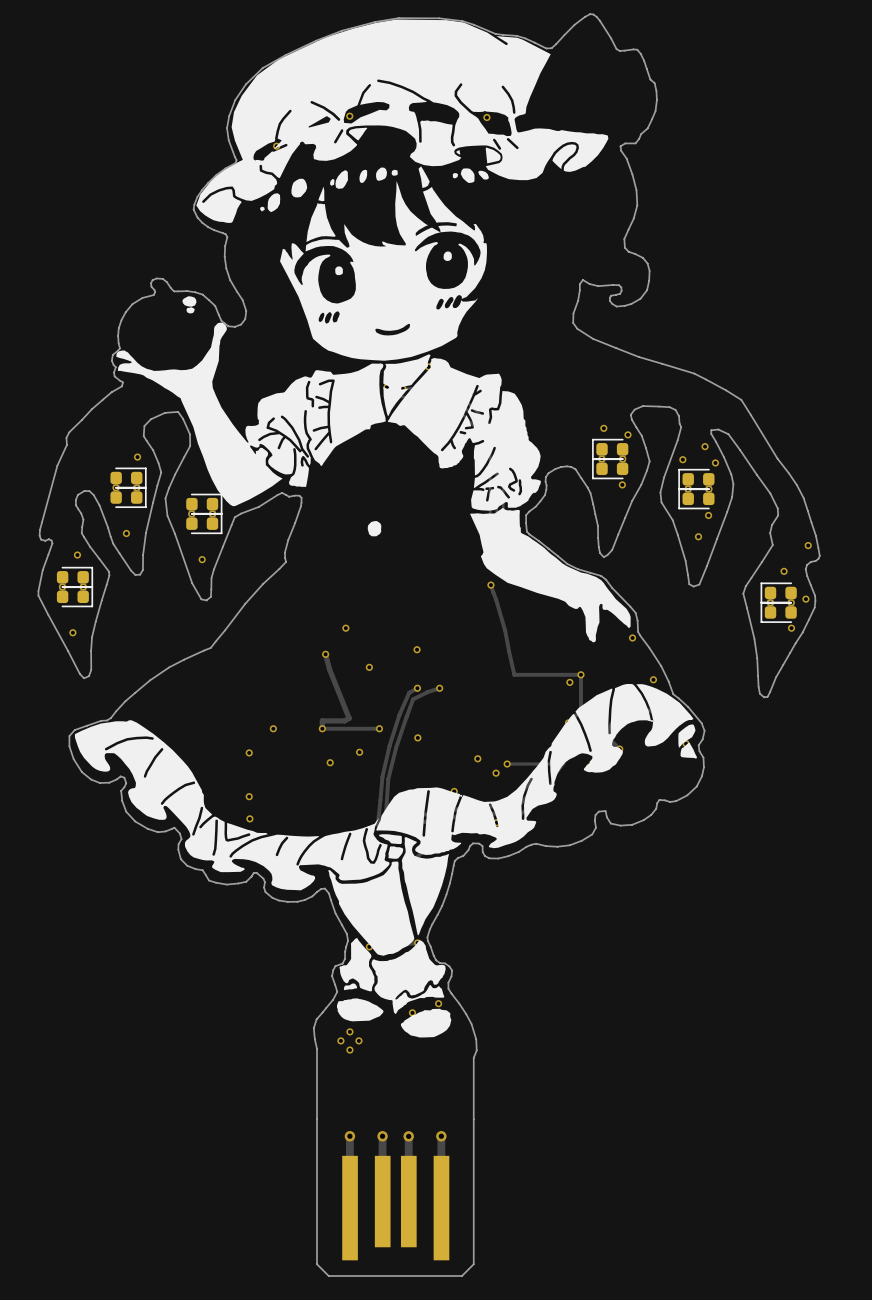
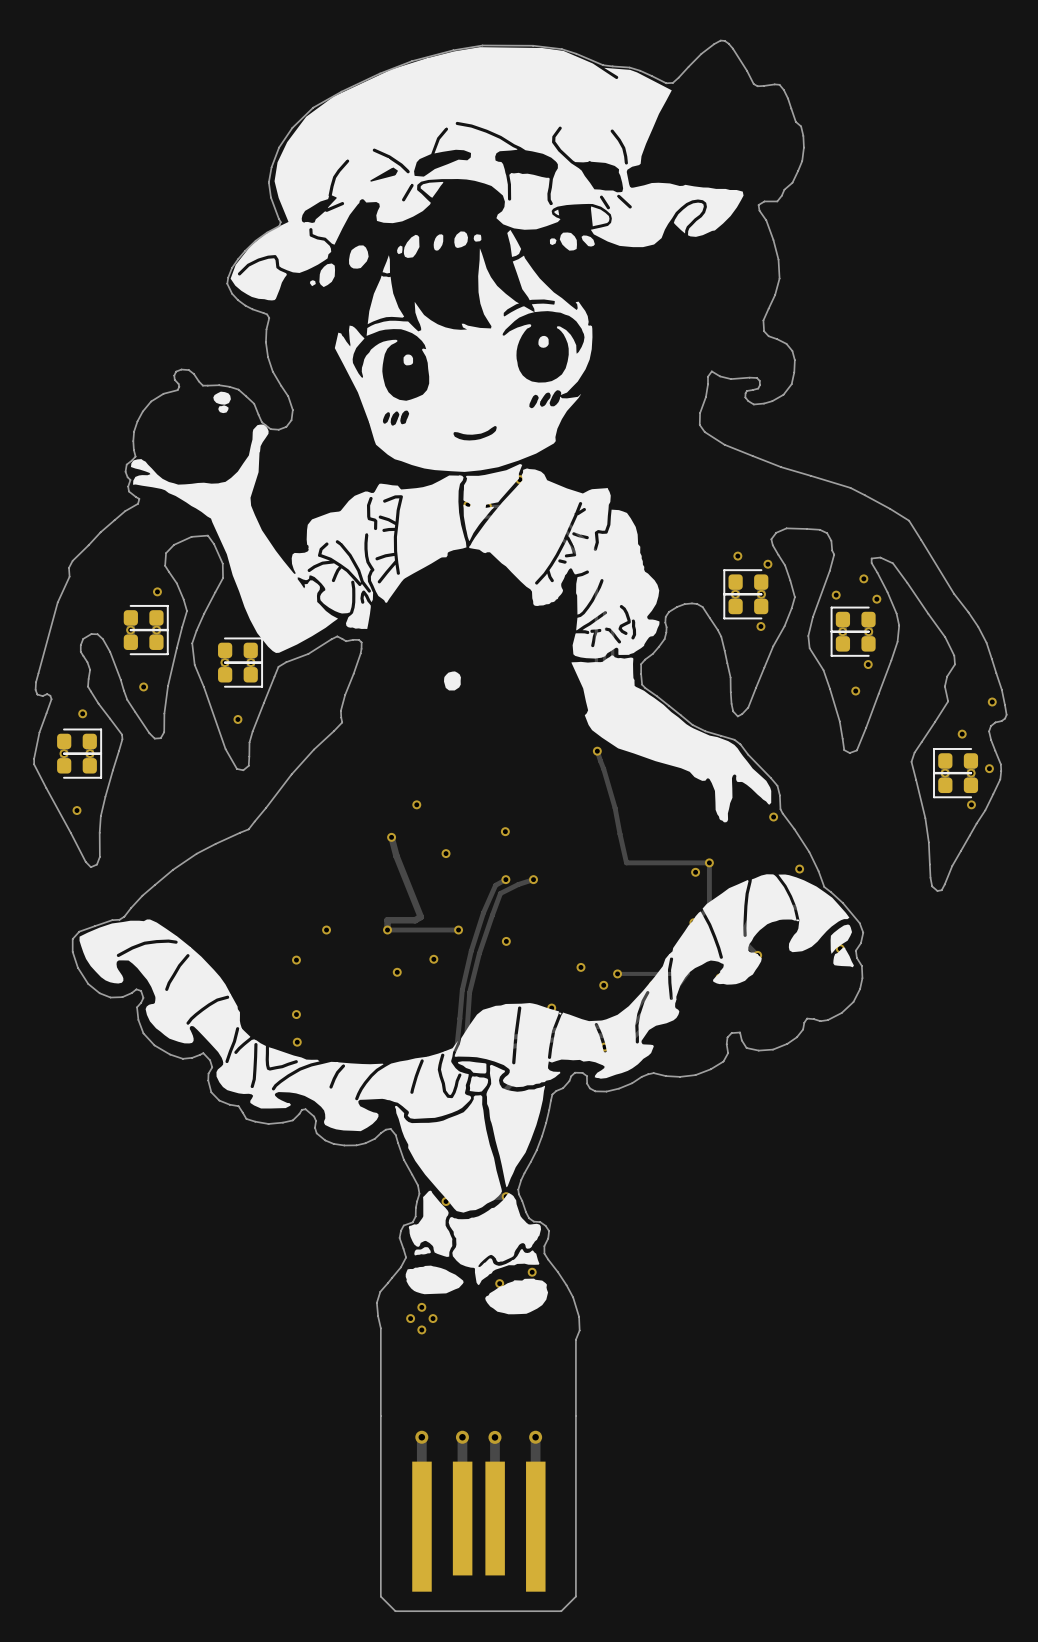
via: (349, 116) -> none
via: (486, 117) -> none
via: (276, 146) -> none

